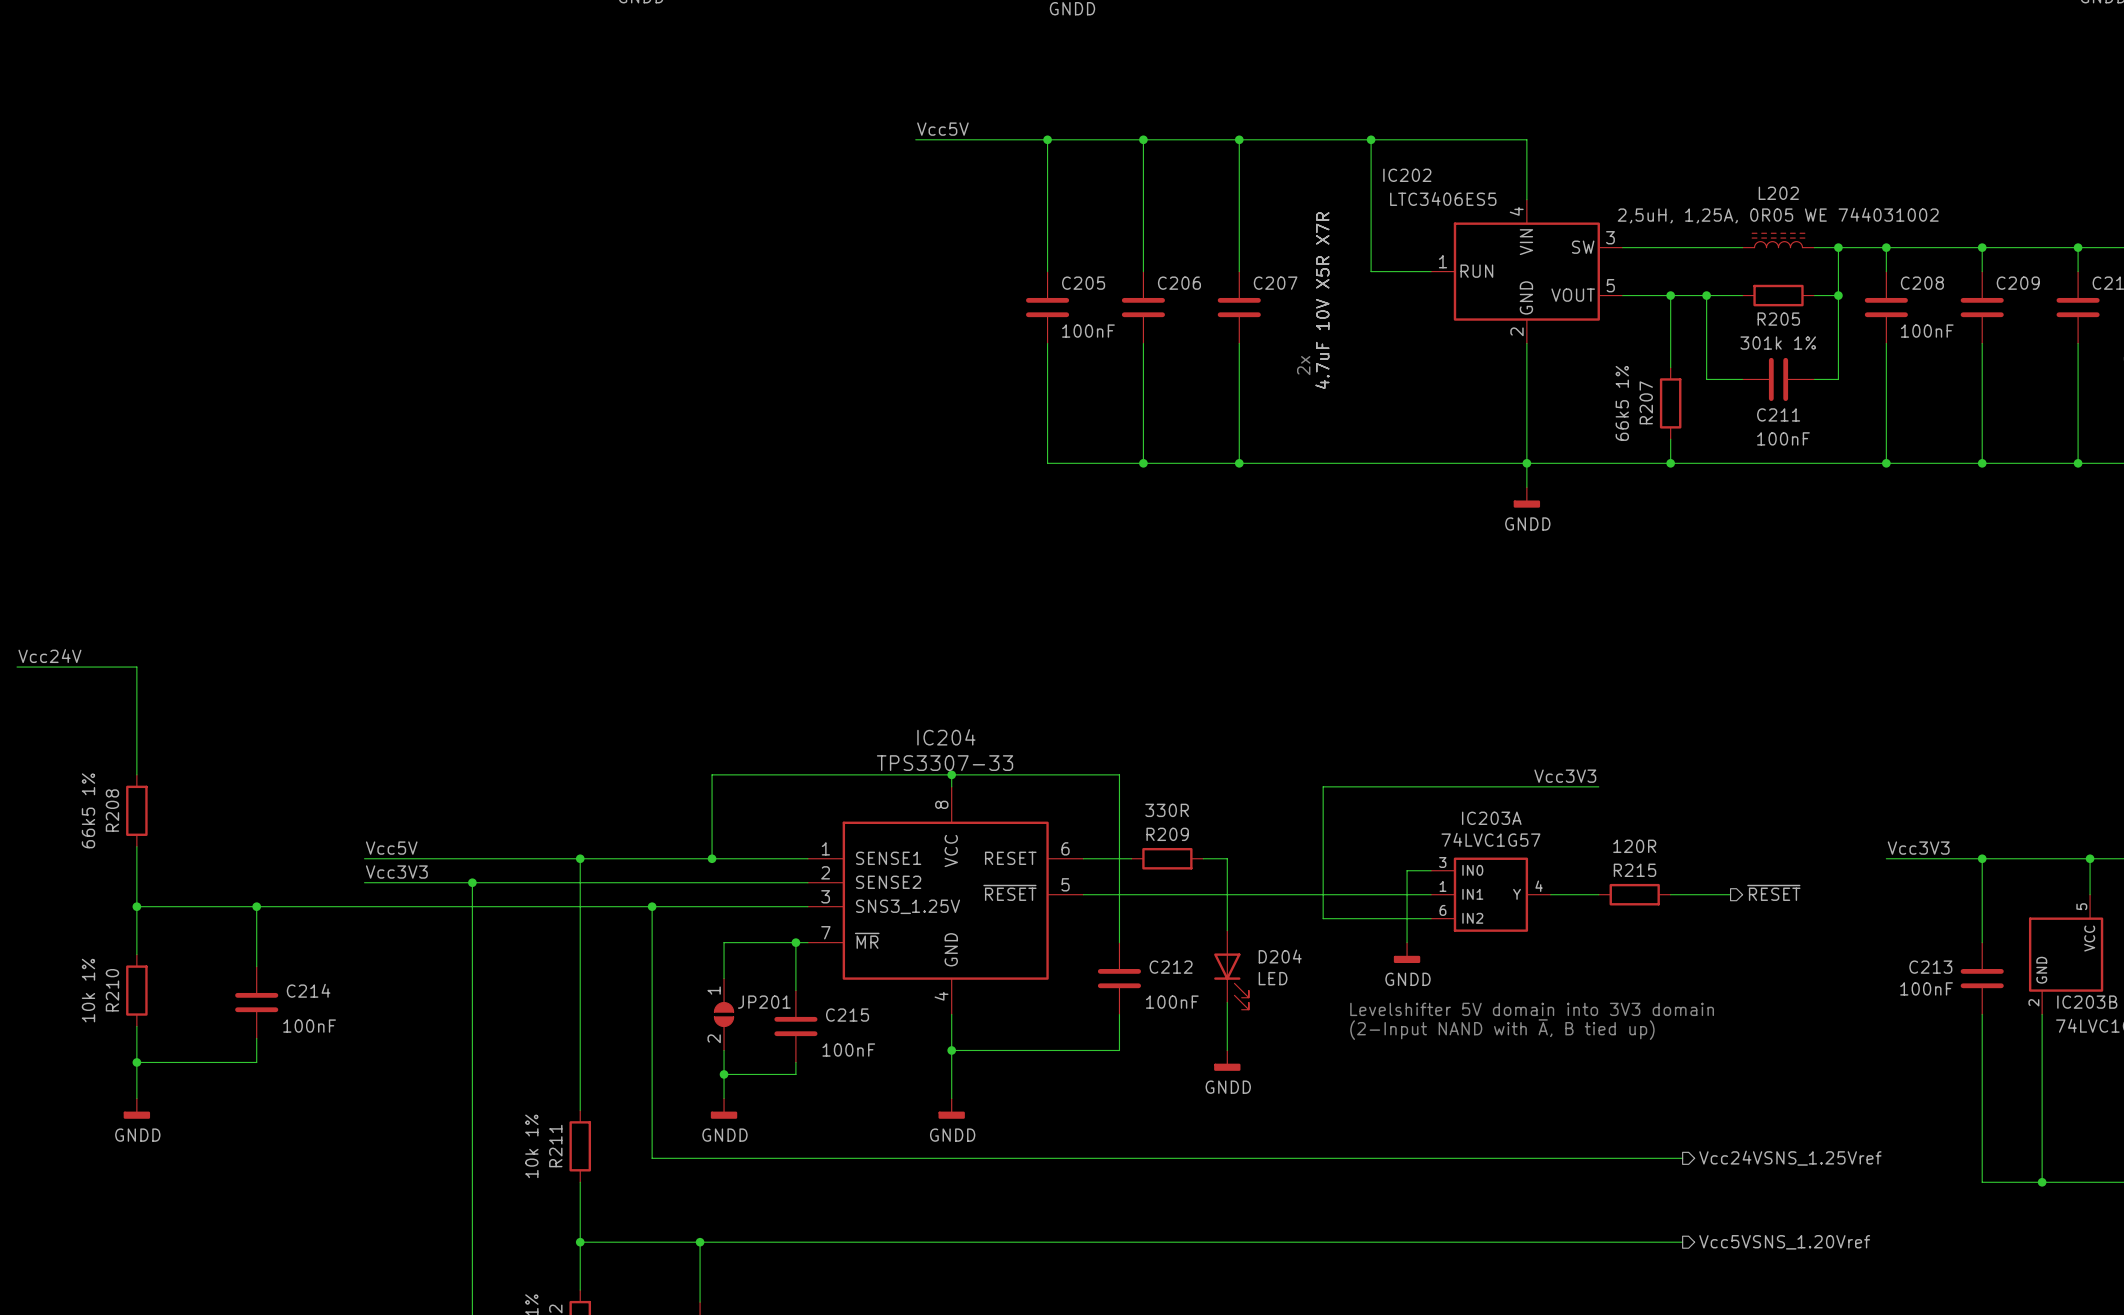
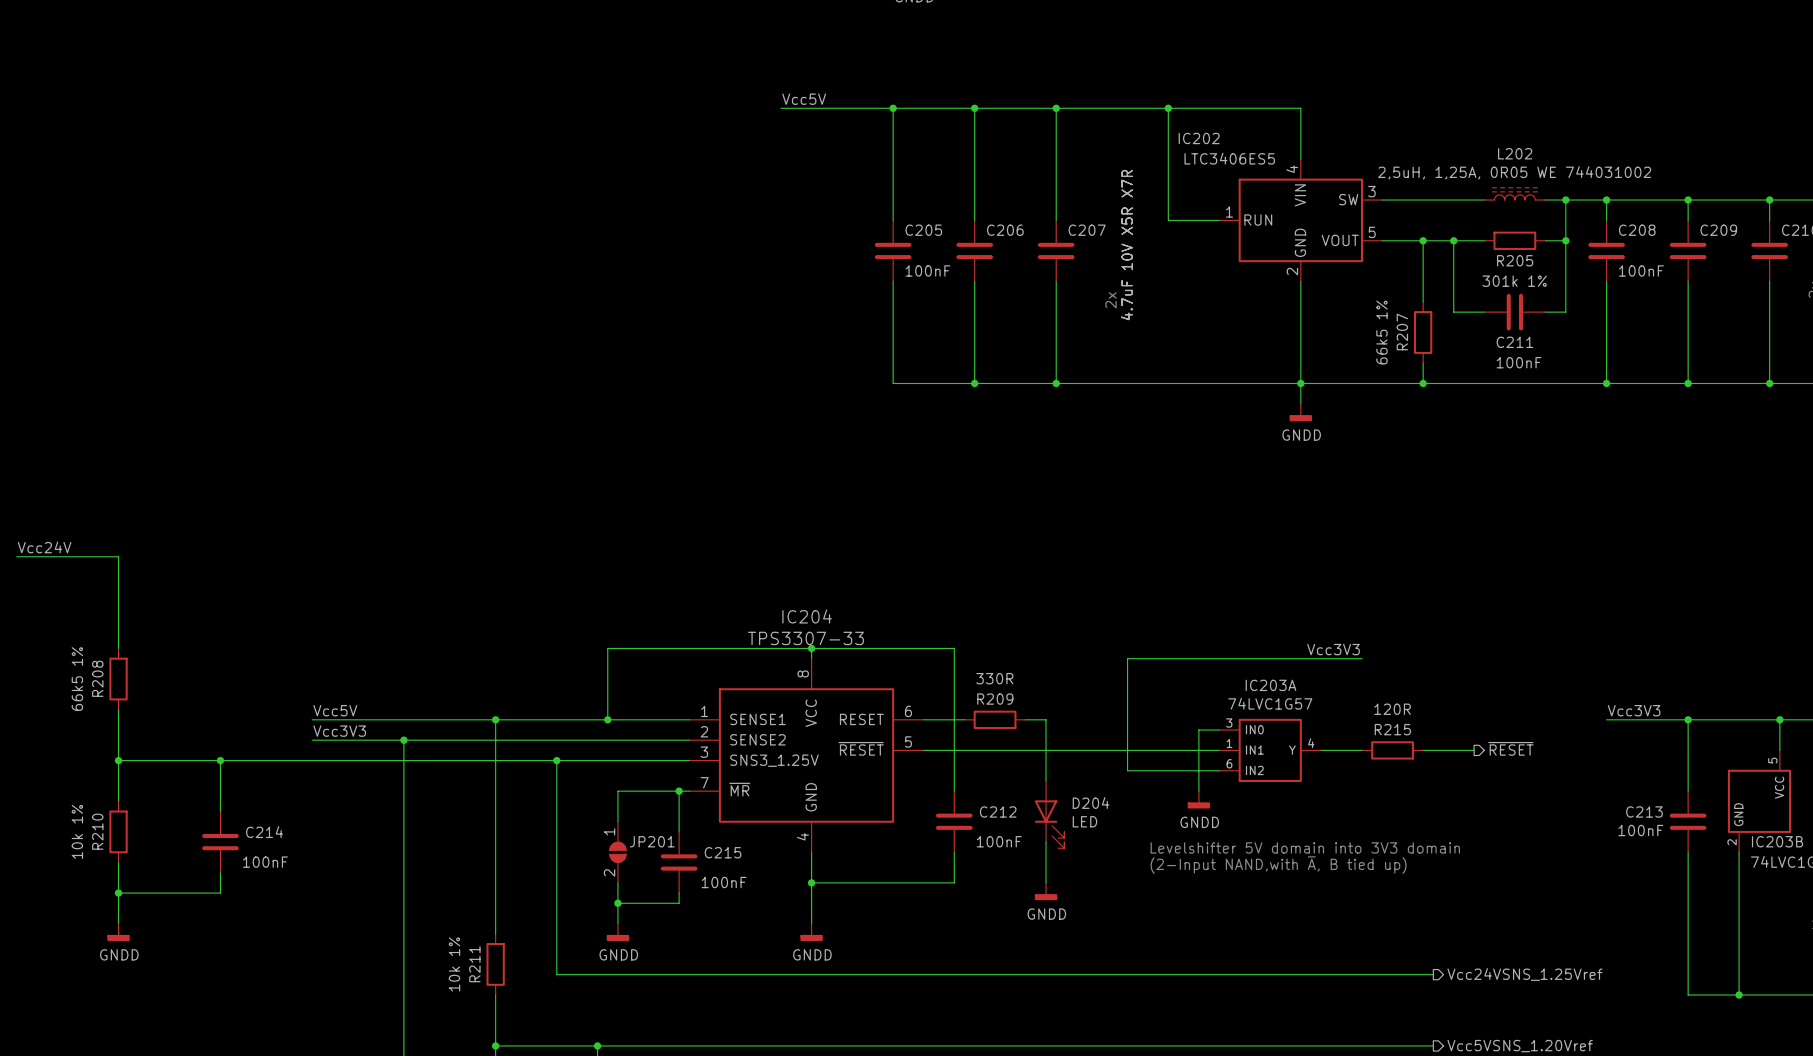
text: (2-Input NAND with ~{A}, B tied up) (1502, 1029) -> (2-Input NAND,with ~{A}, B tied up) (1278, 865)

